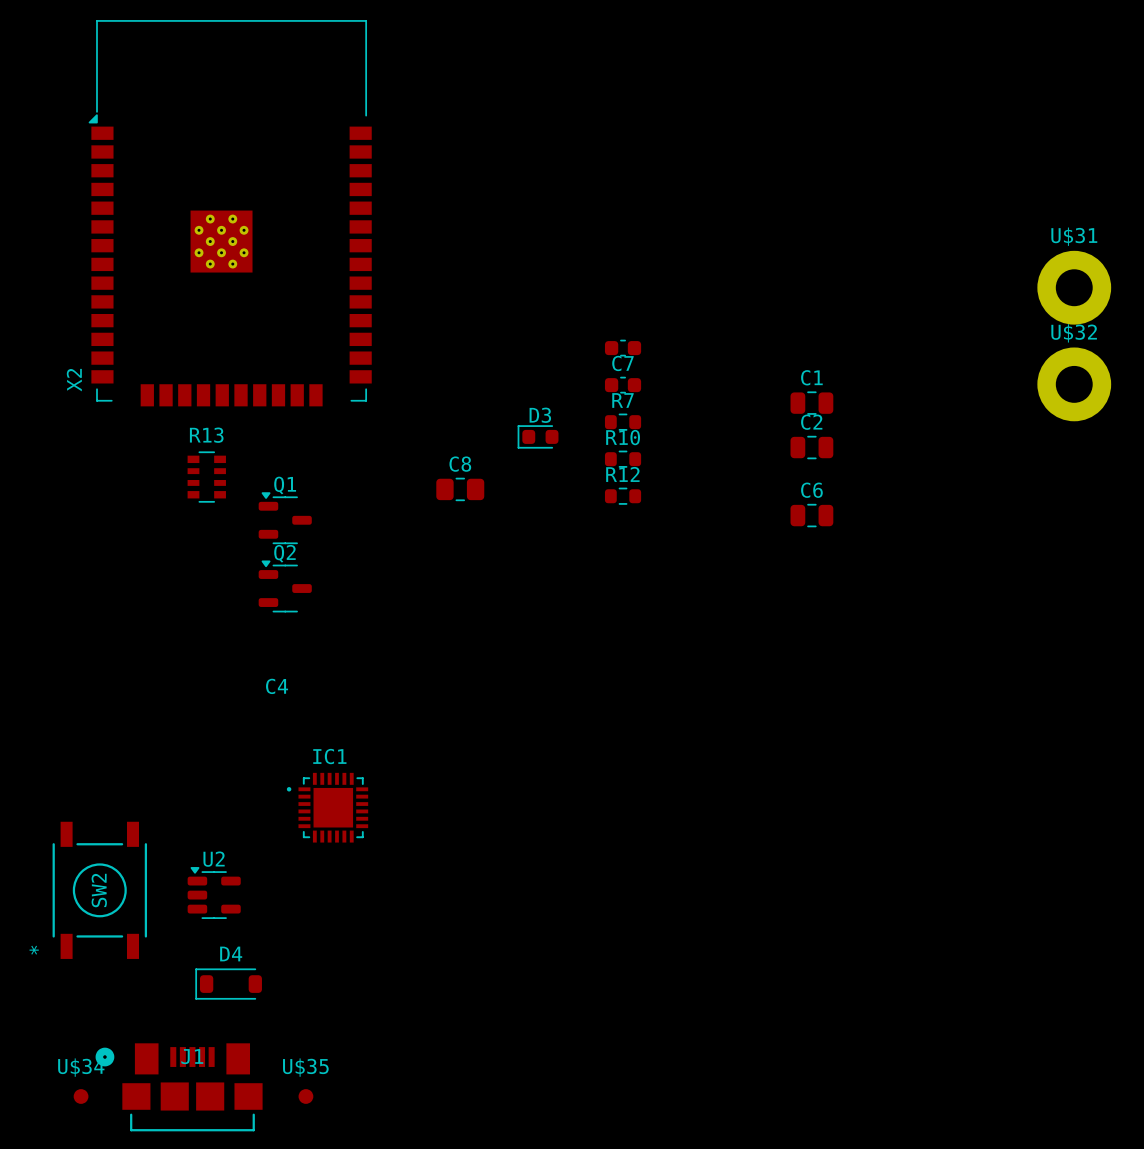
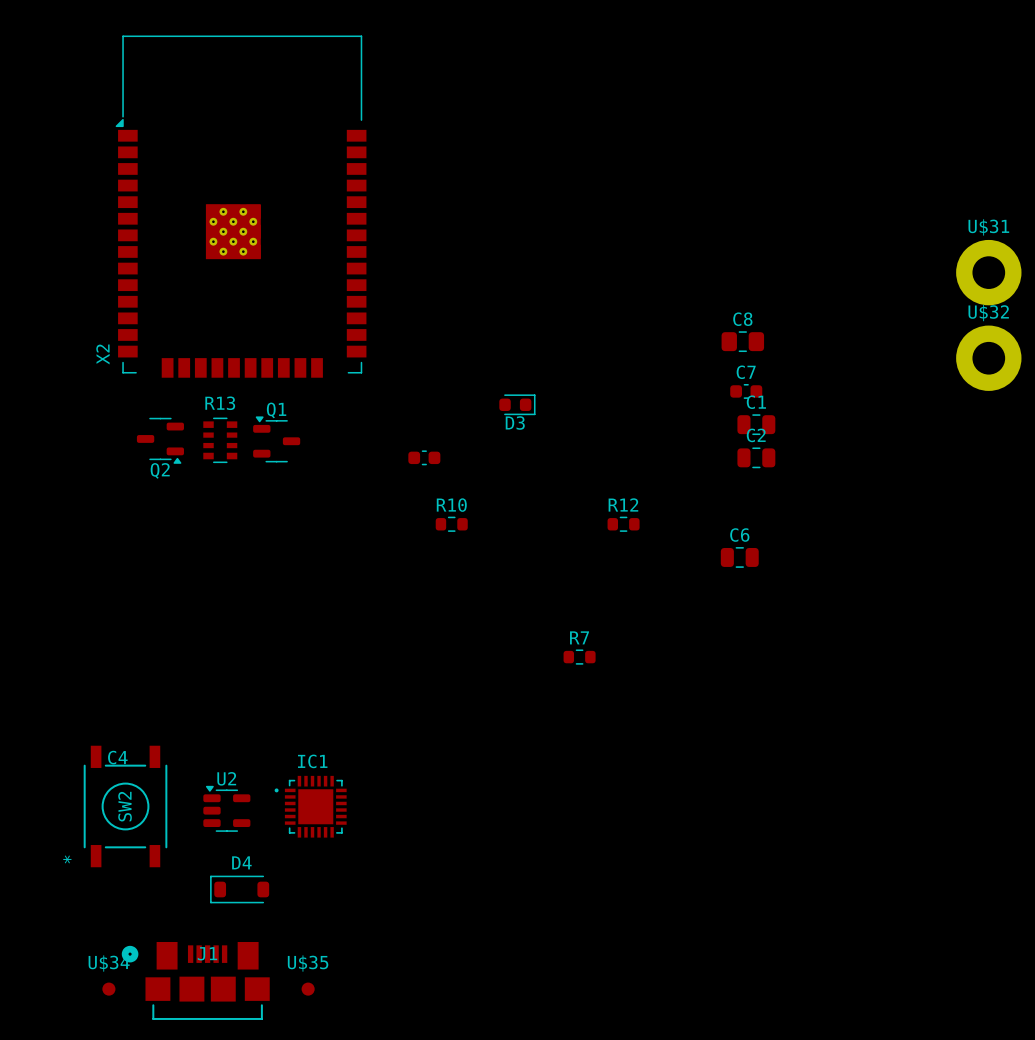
C4 position: (623, 348) -> (424, 457)
C7 position: (623, 385) -> (746, 391)
C1 position: (811, 403) -> (756, 424)
R7 position: (623, 422) -> (579, 657)
D3 rotation: 0° (538, 436) -> 180° (517, 404)
C2 position: (811, 447) -> (756, 457)
R10 position: (623, 459) -> (451, 524)
C8 position: (460, 489) -> (742, 341)
R12 position: (623, 496) -> (623, 524)
C6 position: (811, 515) -> (739, 557)
Q1 position: (285, 518) -> (276, 439)
Q2 rotation: 0° (285, 586) -> 180° (160, 440)
Q2 position: (285, 586) -> (160, 440)
IC1 position: (327, 807) -> (310, 806)

